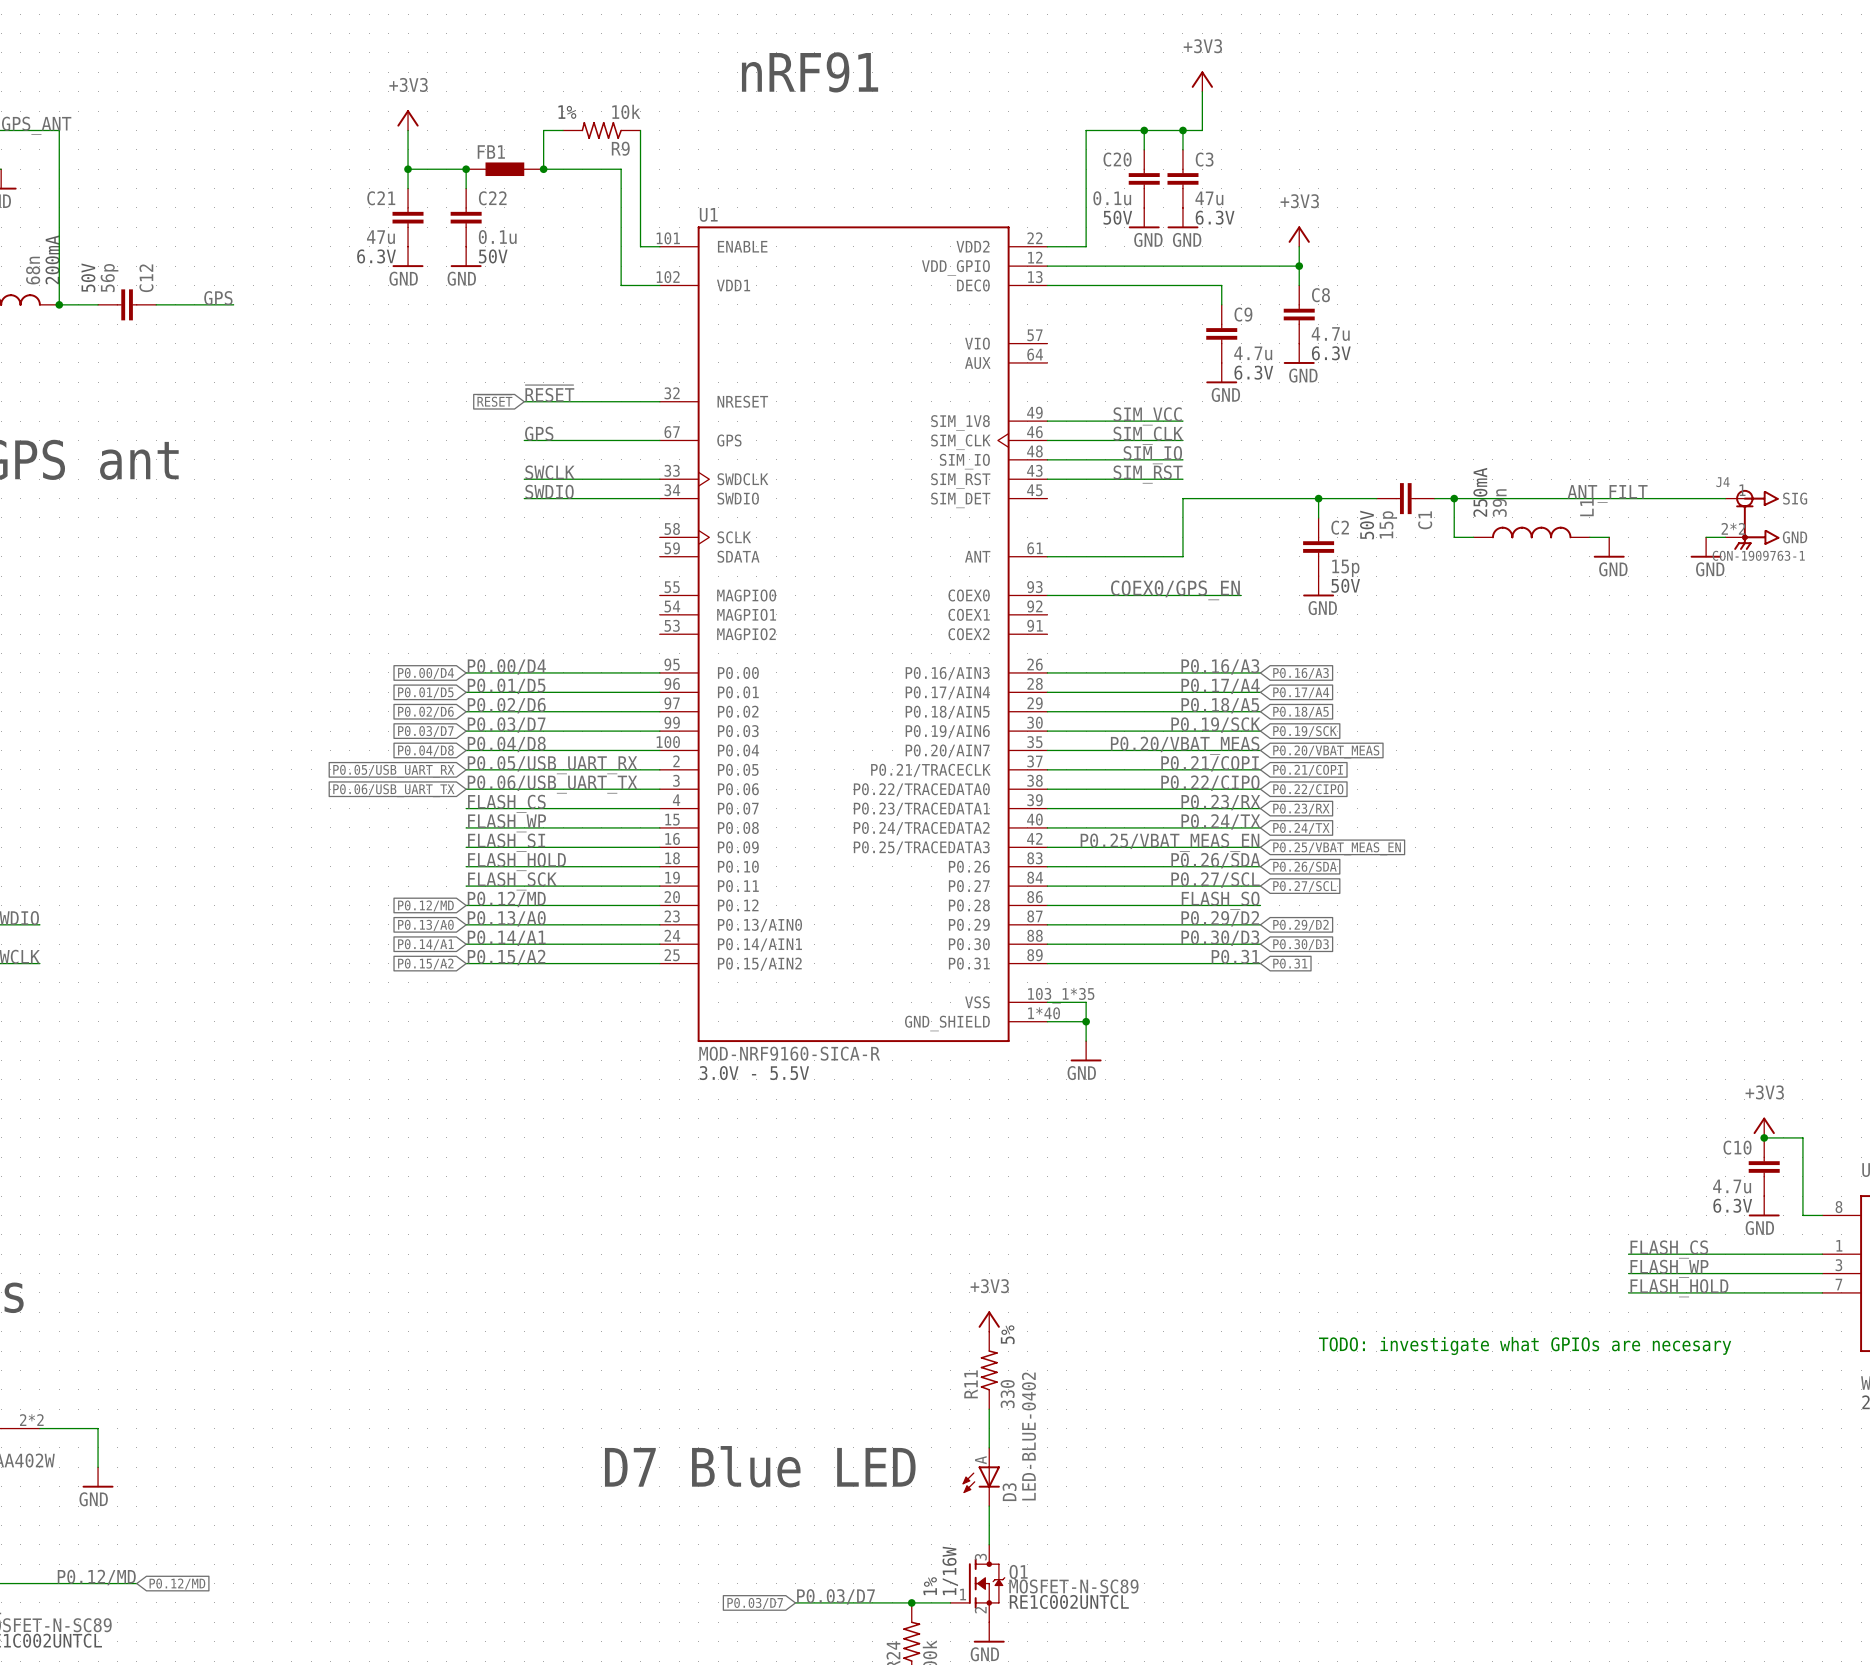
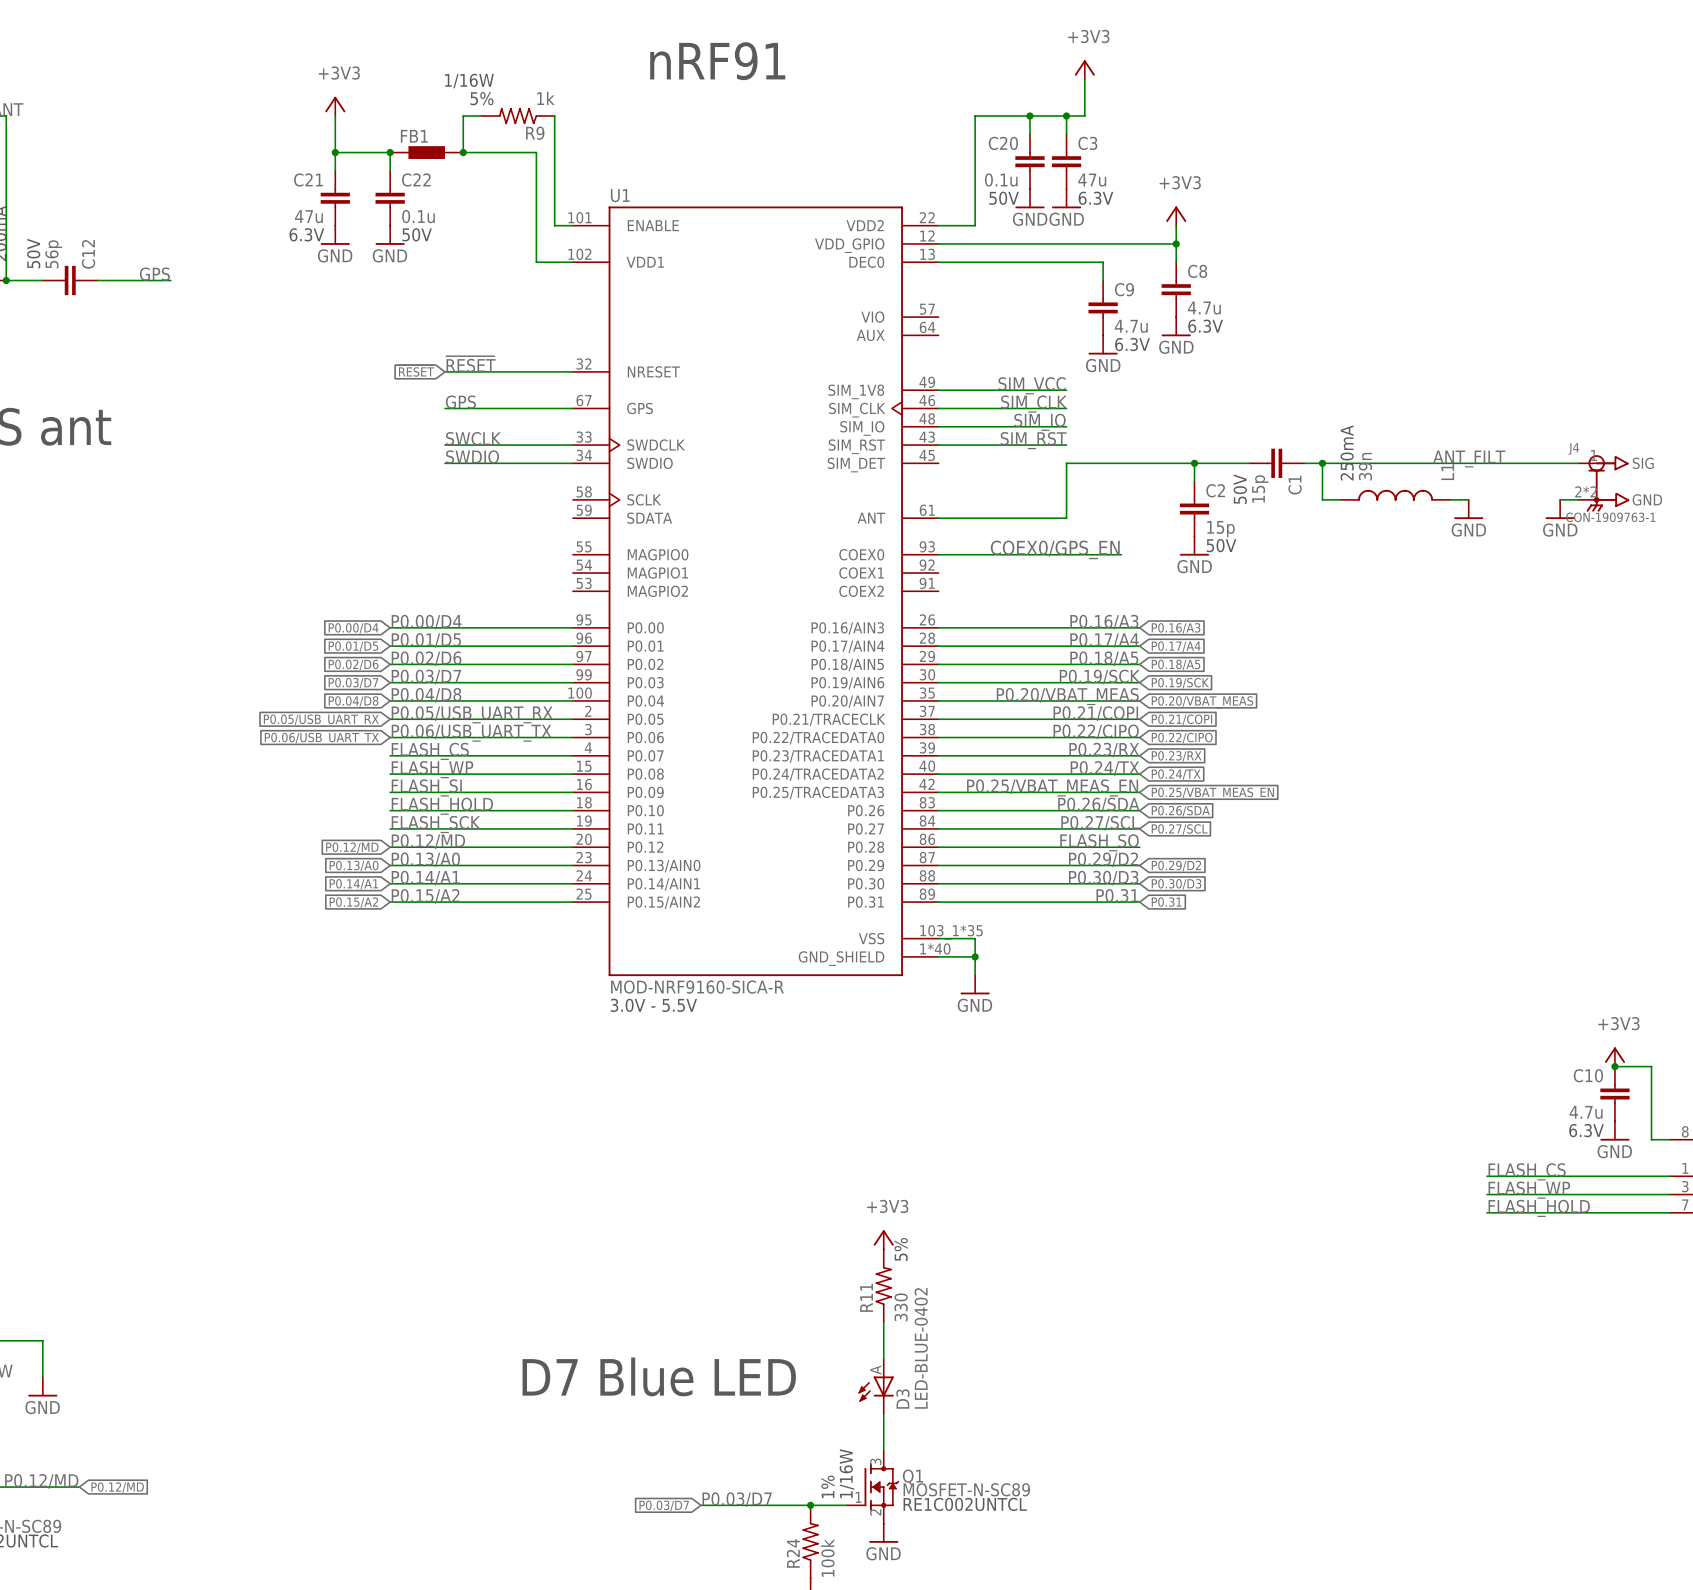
R9 text: none -> 1/16W (469, 81)
R9 value: 10k (626, 111) -> 1k (545, 98)
R9 text: 1% (567, 112) -> 5% (482, 98)
text: TODO: investigate what GPIOs are necesary (1525, 1346) -> none

